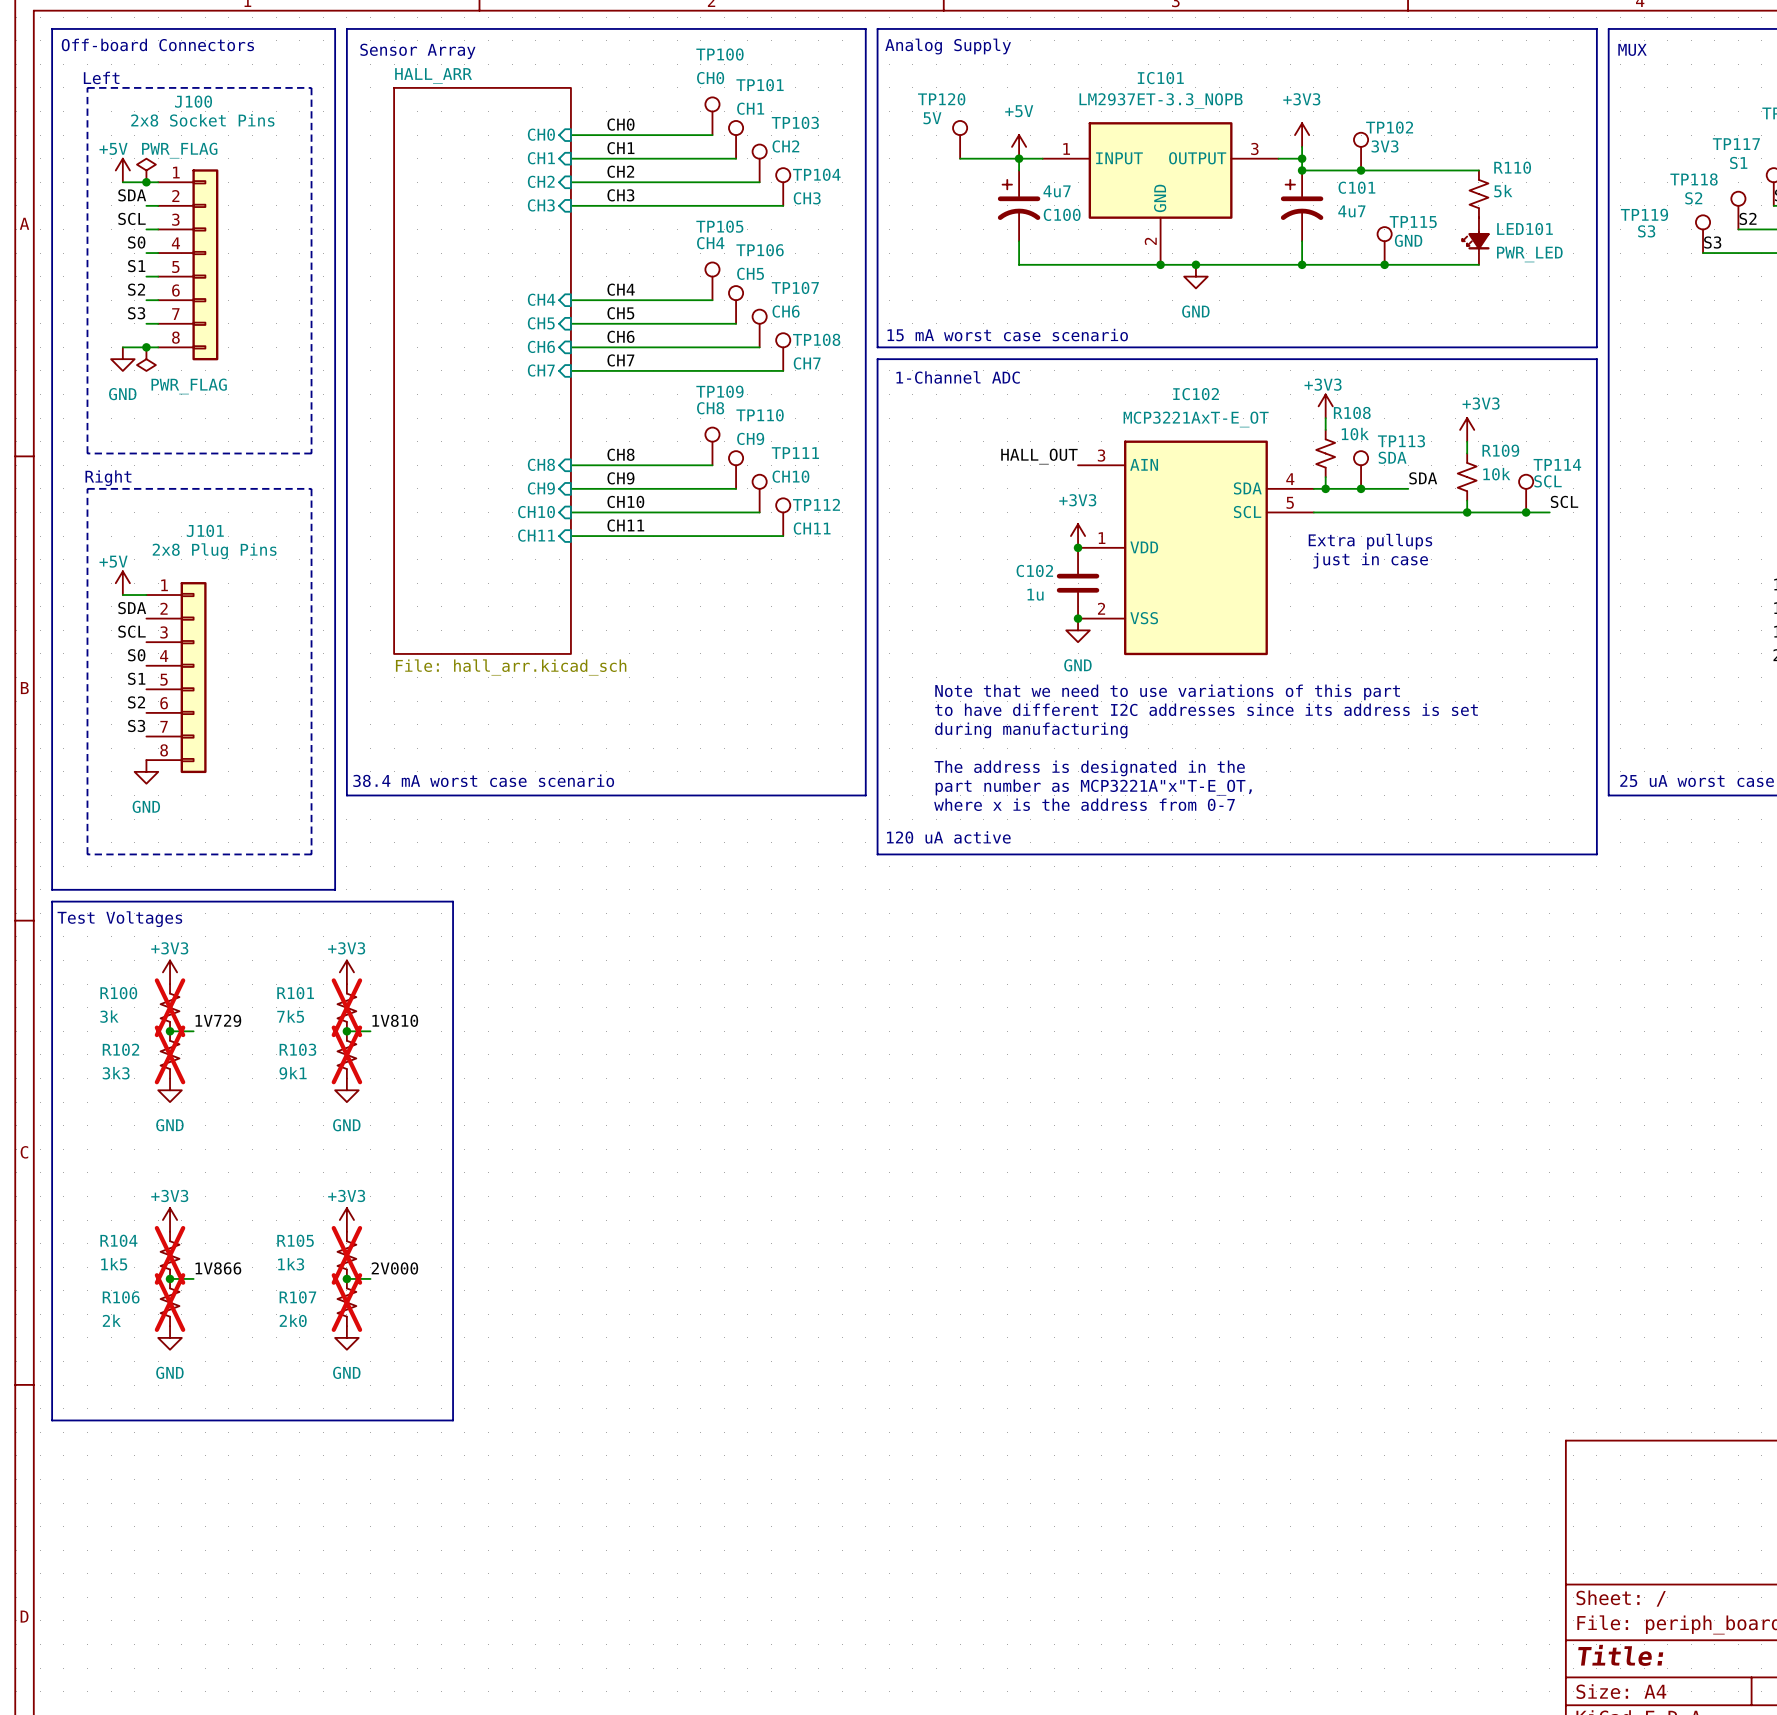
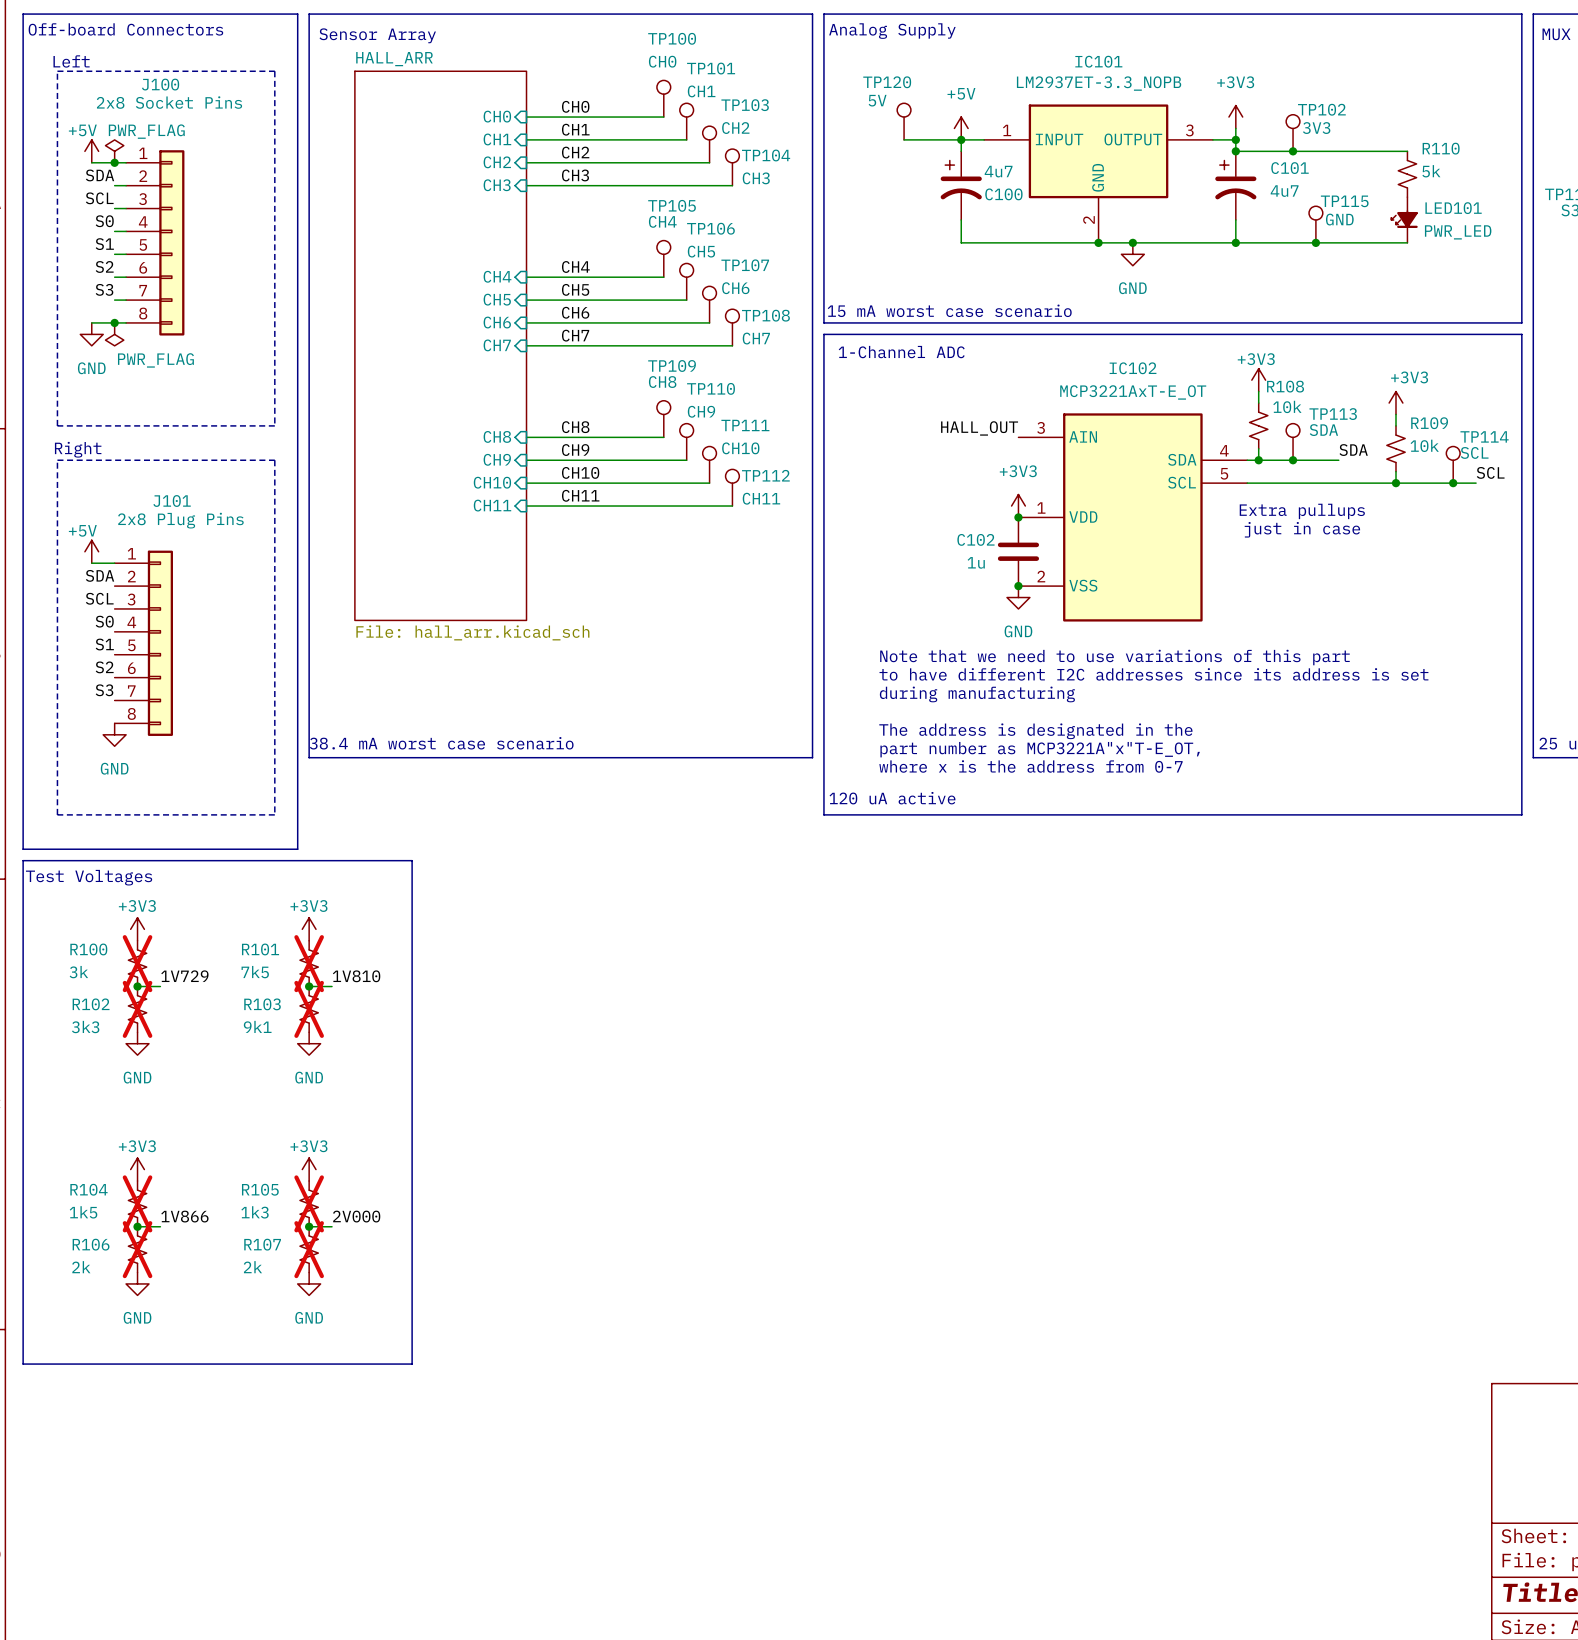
R107 value: 2k0 (293, 1320) -> 2k (252, 1267)

